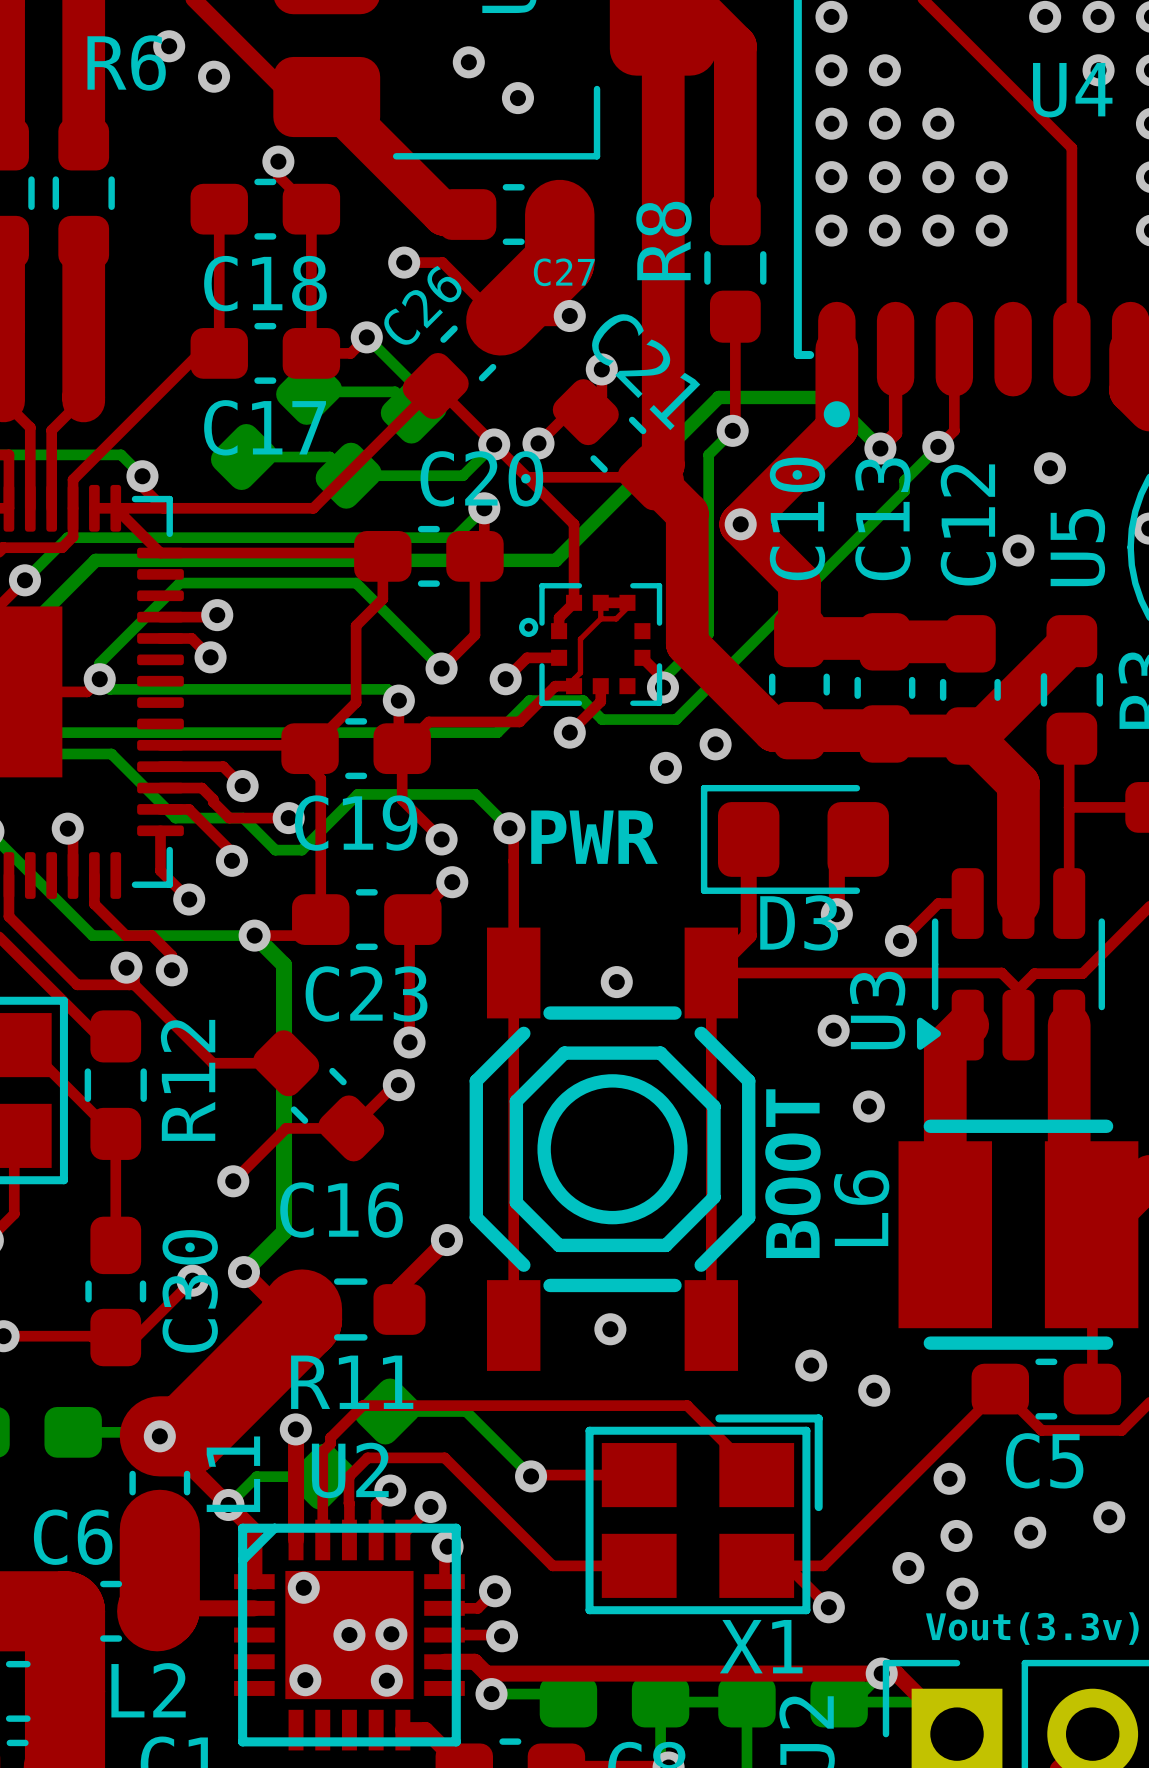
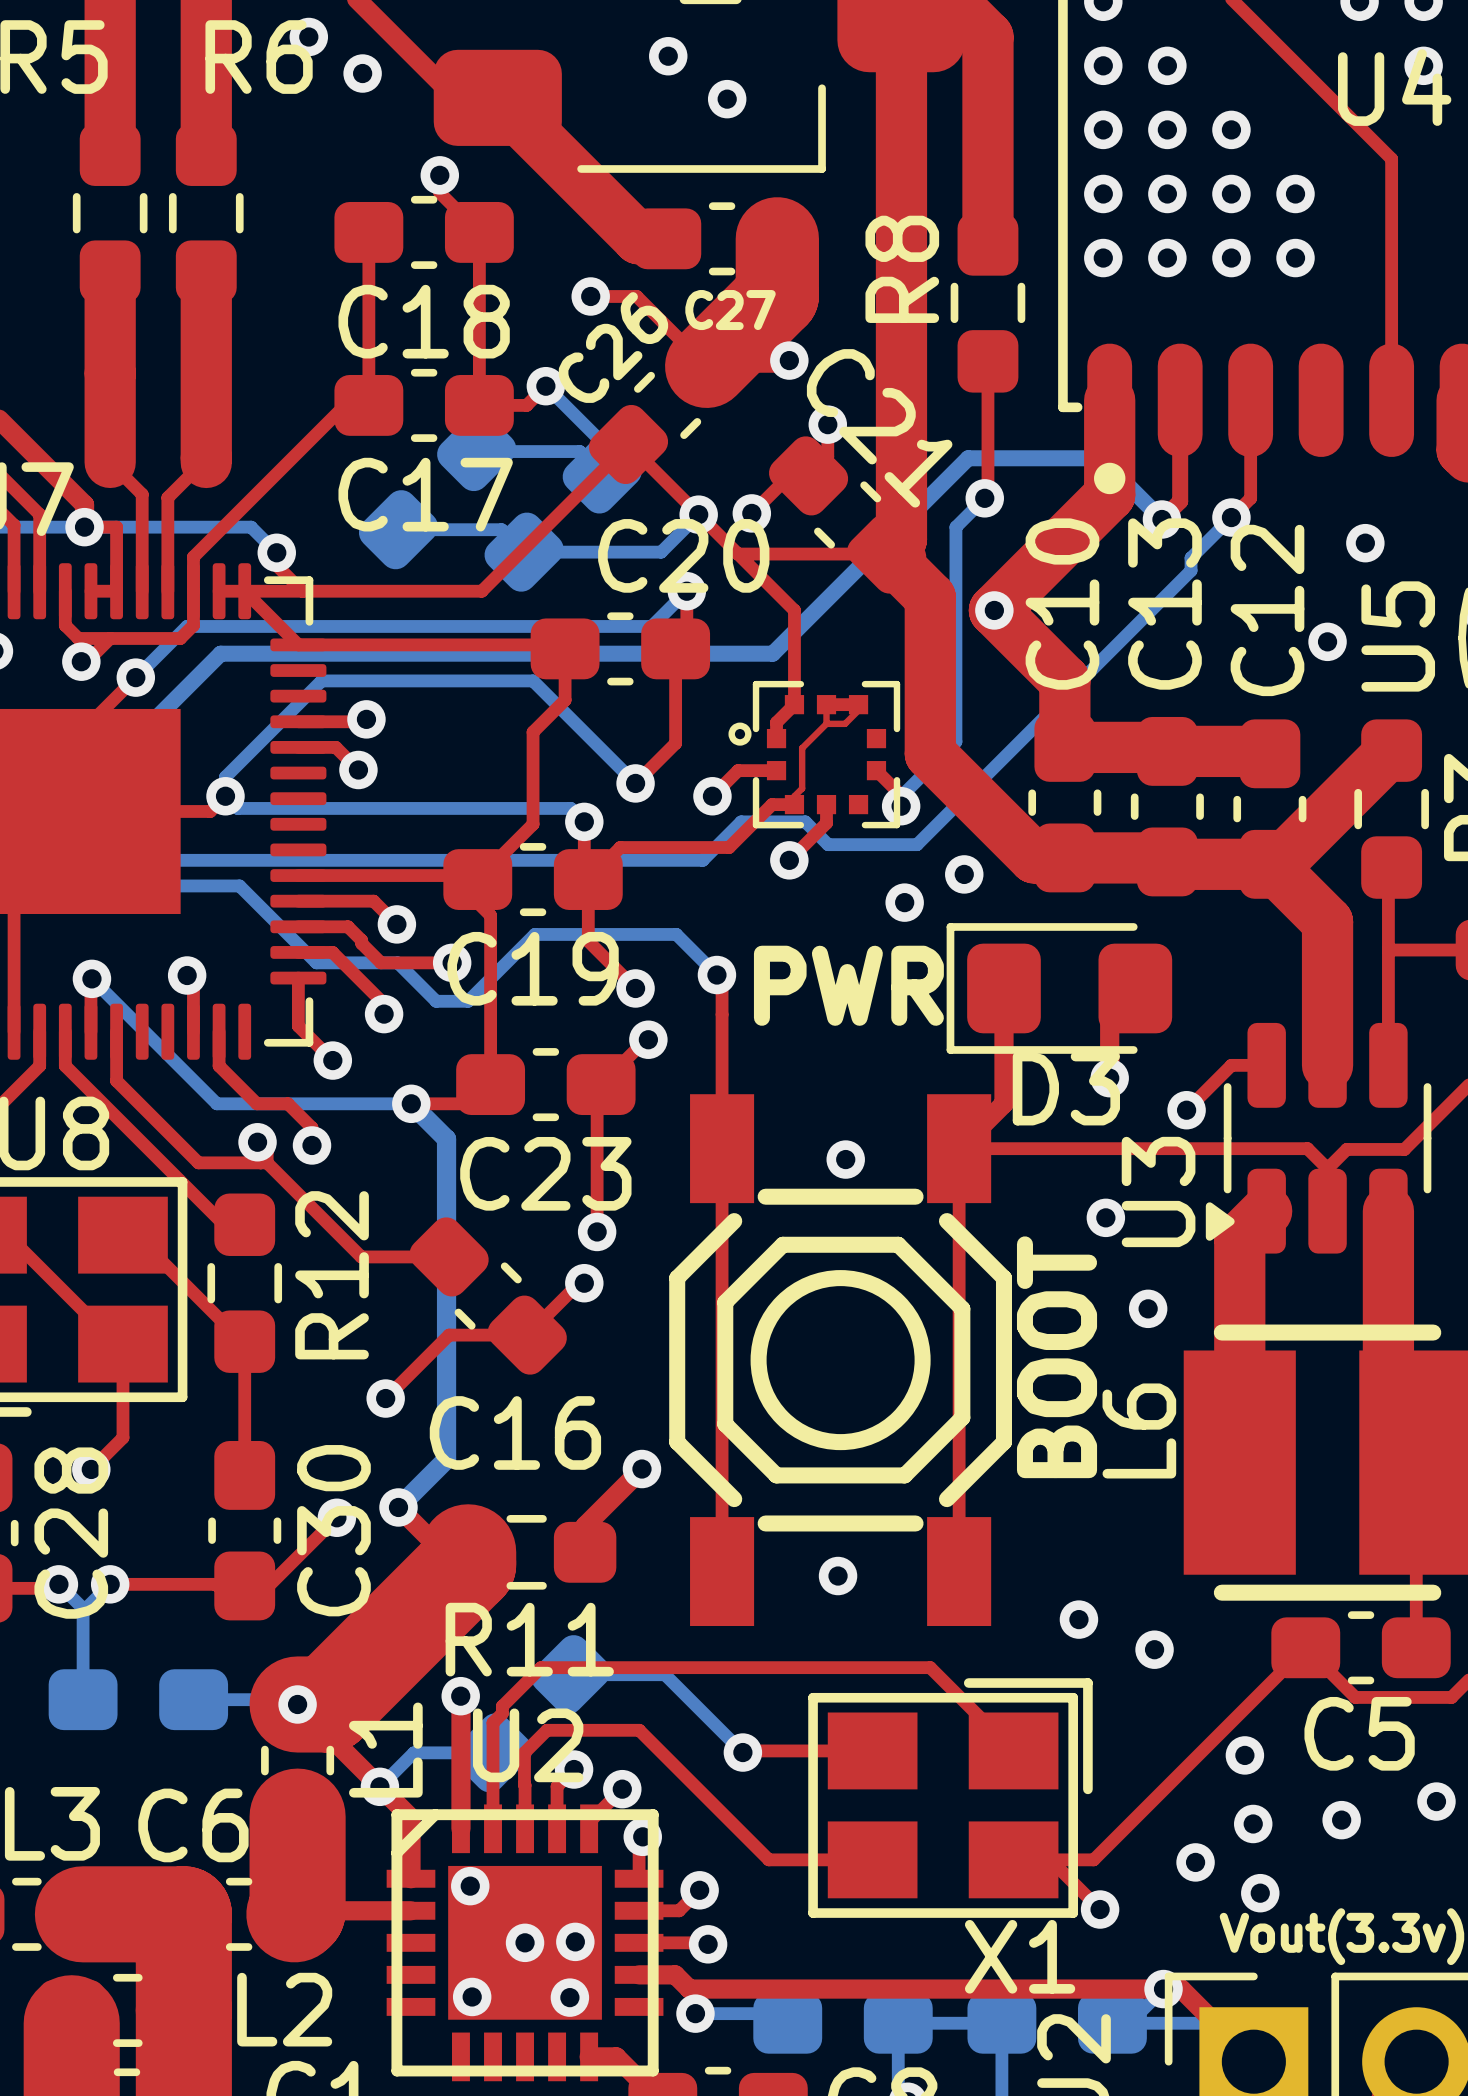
C27 name position: C27 (564, 272) -> C27 (730, 310)

